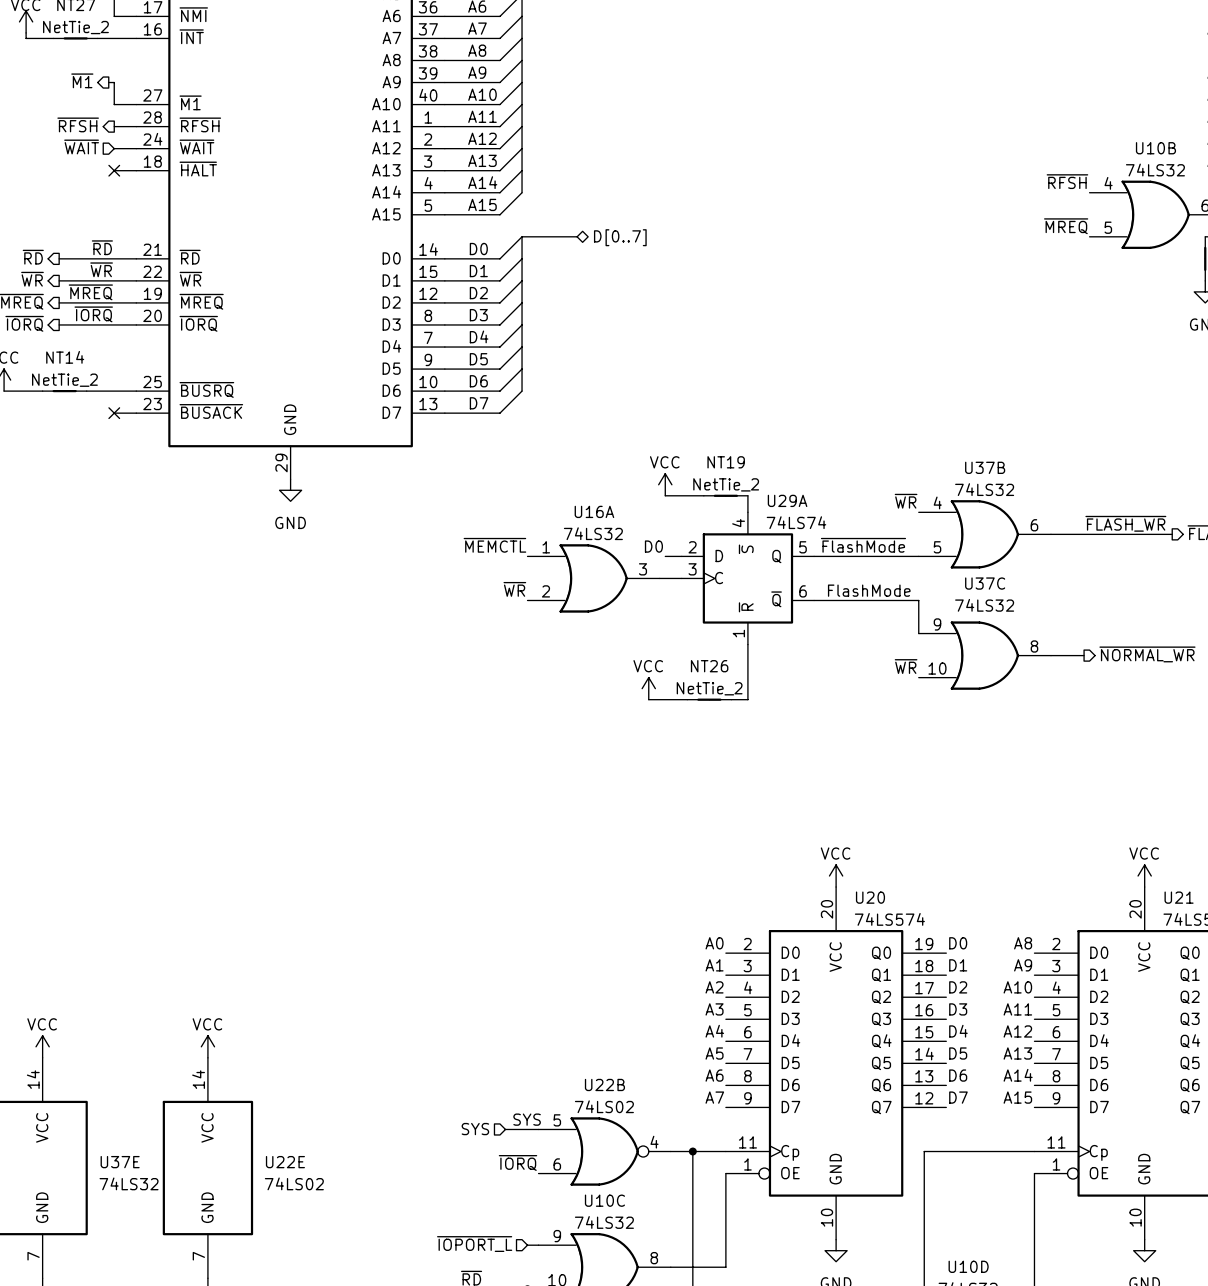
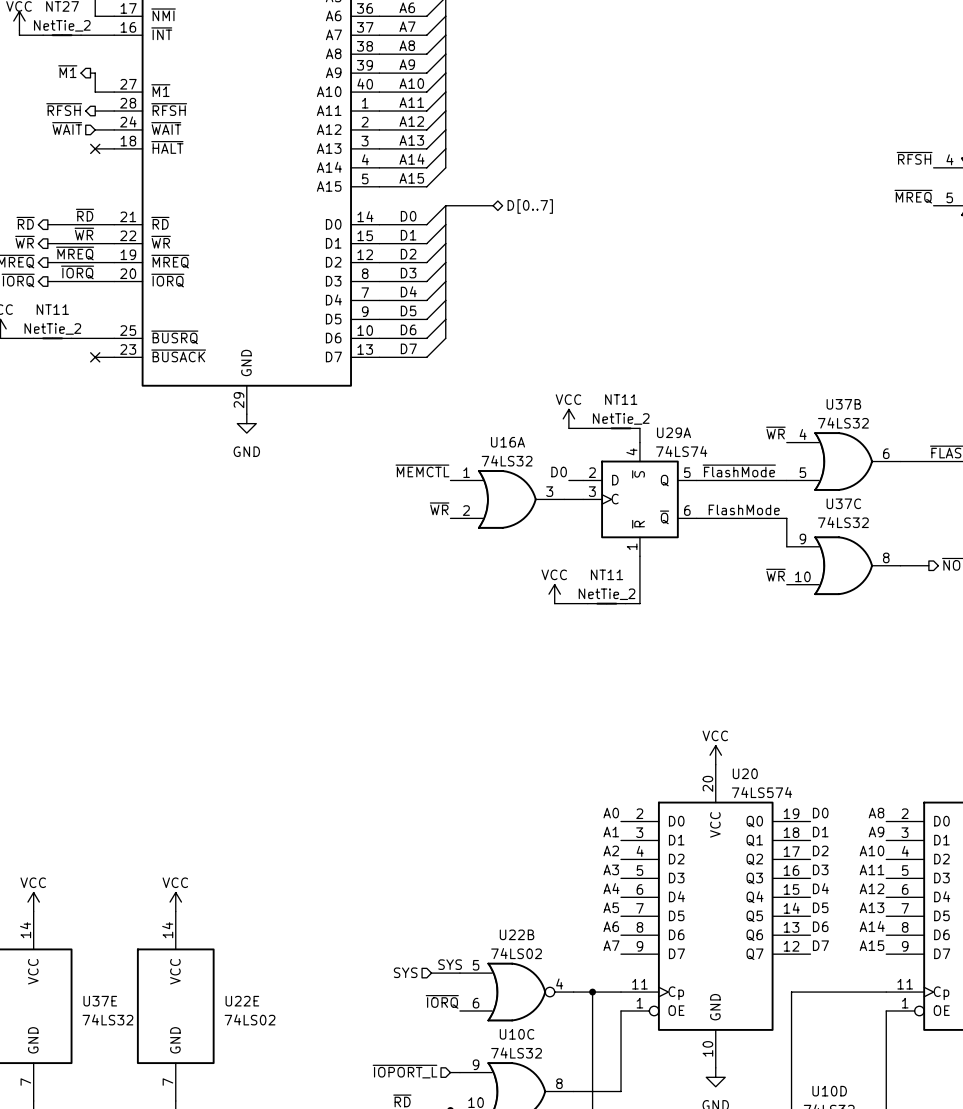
NT14 name: NT14 (65, 357) -> NT11 (52, 309)
NT19 name: NT19 (726, 462) -> NT11 (621, 399)
NT26 name: NT26 (709, 666) -> NT11 (607, 574)

